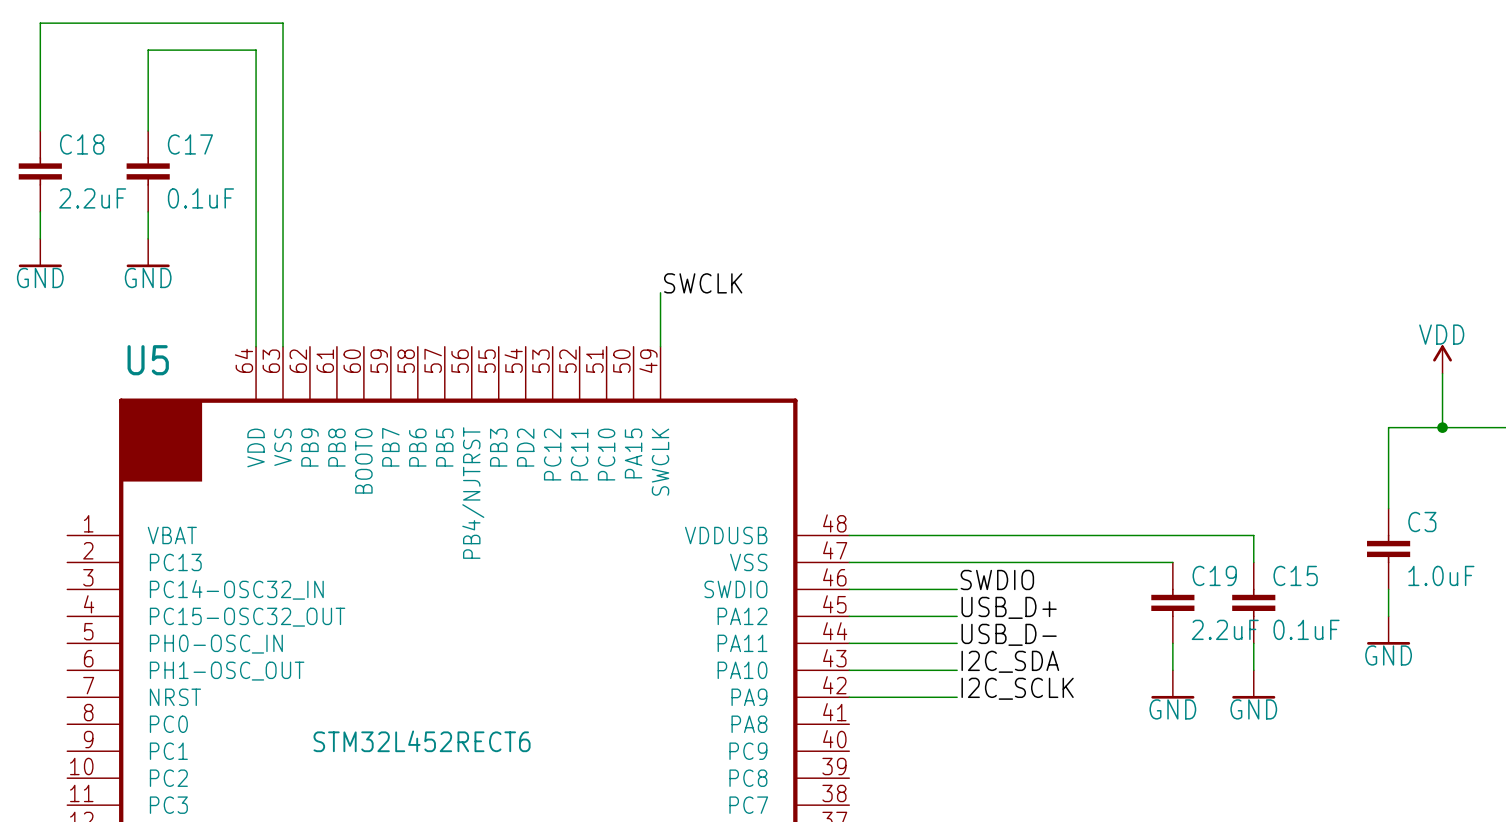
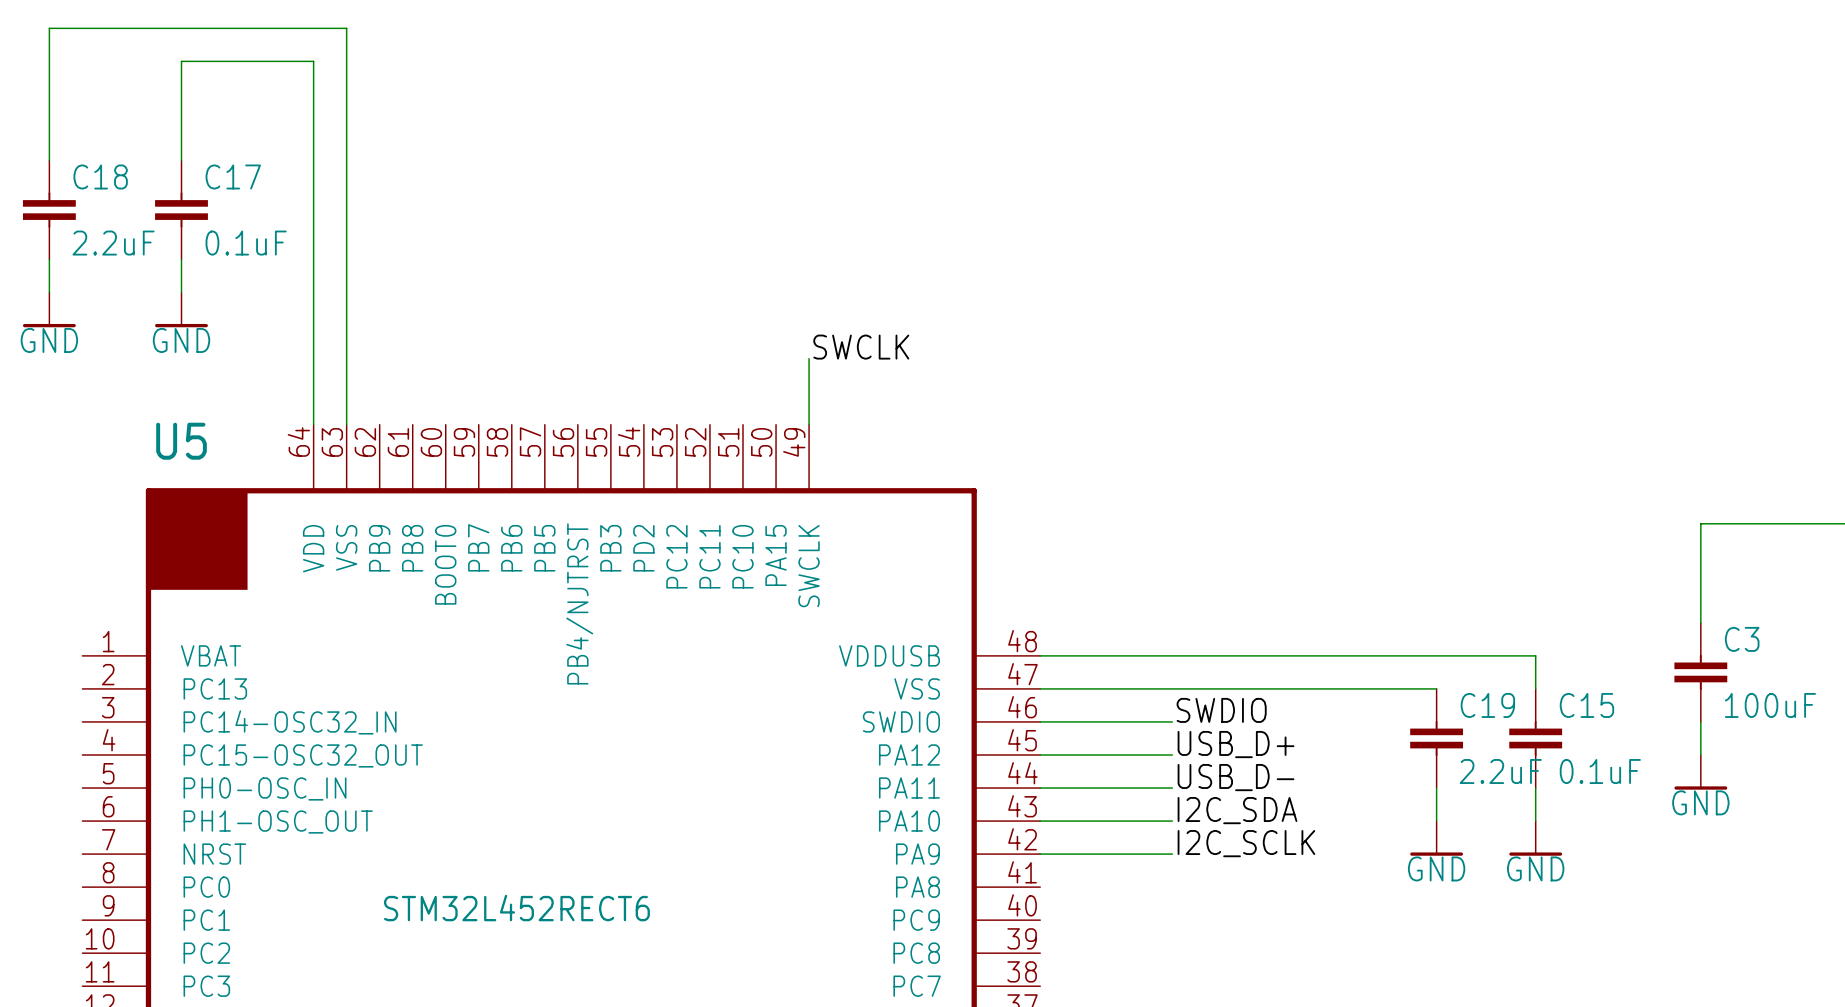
power symbol: VDD (1442, 359) -> none
wire: (1442, 373) (1442, 427) -> none
junction: (1442, 427) -> none
C3 value: 1.0uF (1441, 575) -> 100uF (1770, 705)

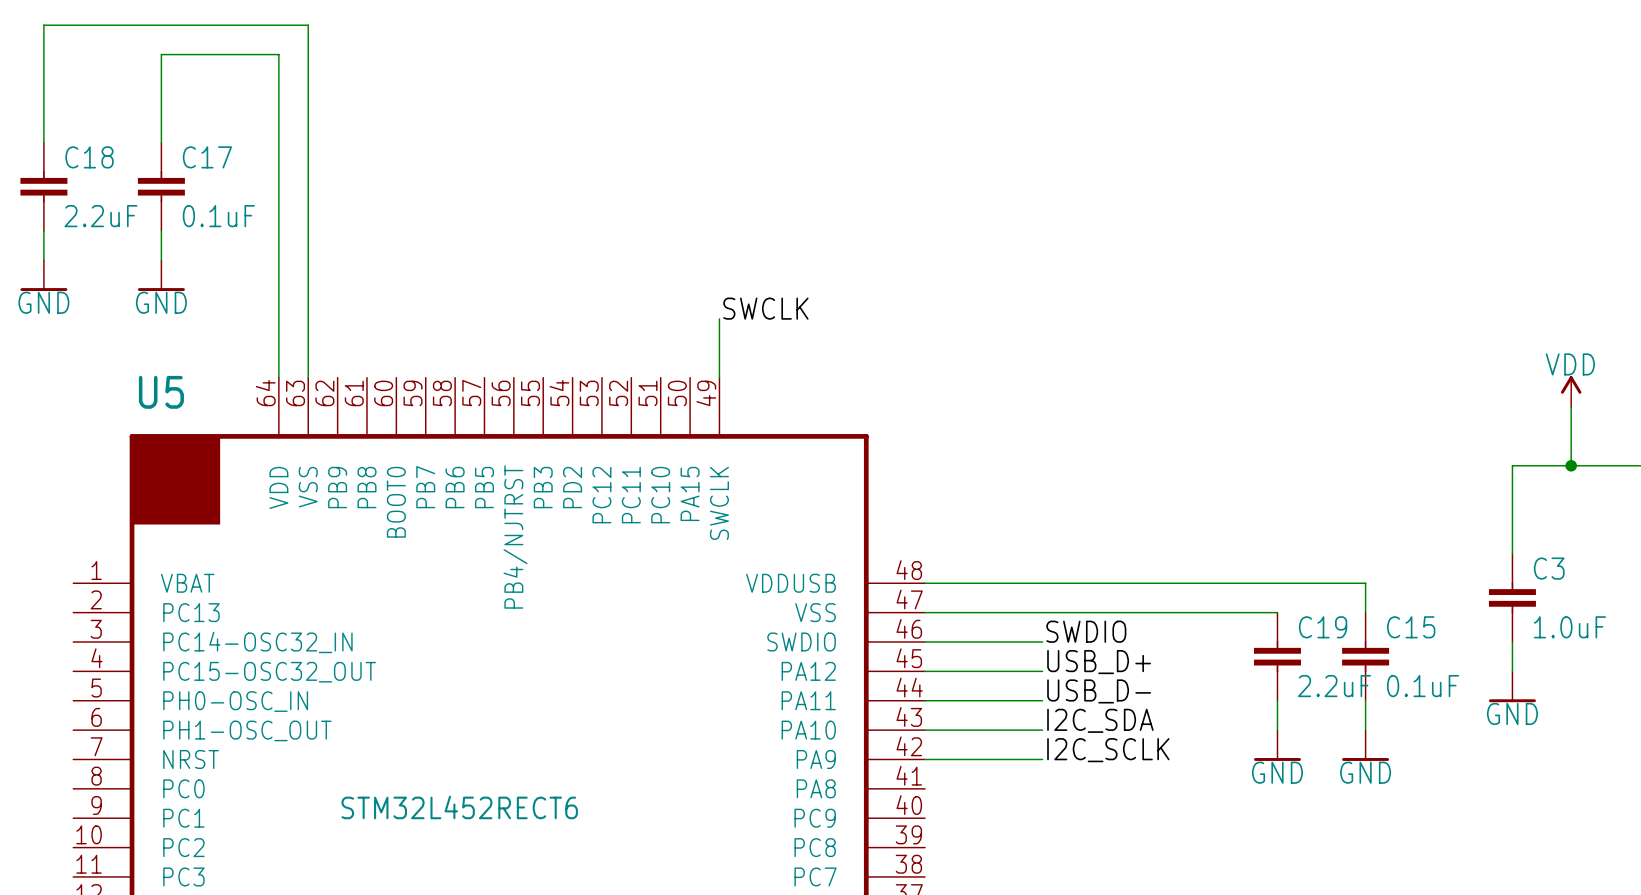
power symbol: none -> VDD (1571, 391)
wire: none -> (1571, 407) (1571, 465)
junction: none -> (1571, 465)
C3 value: 100uF (1770, 705) -> 1.0uF (1569, 627)

